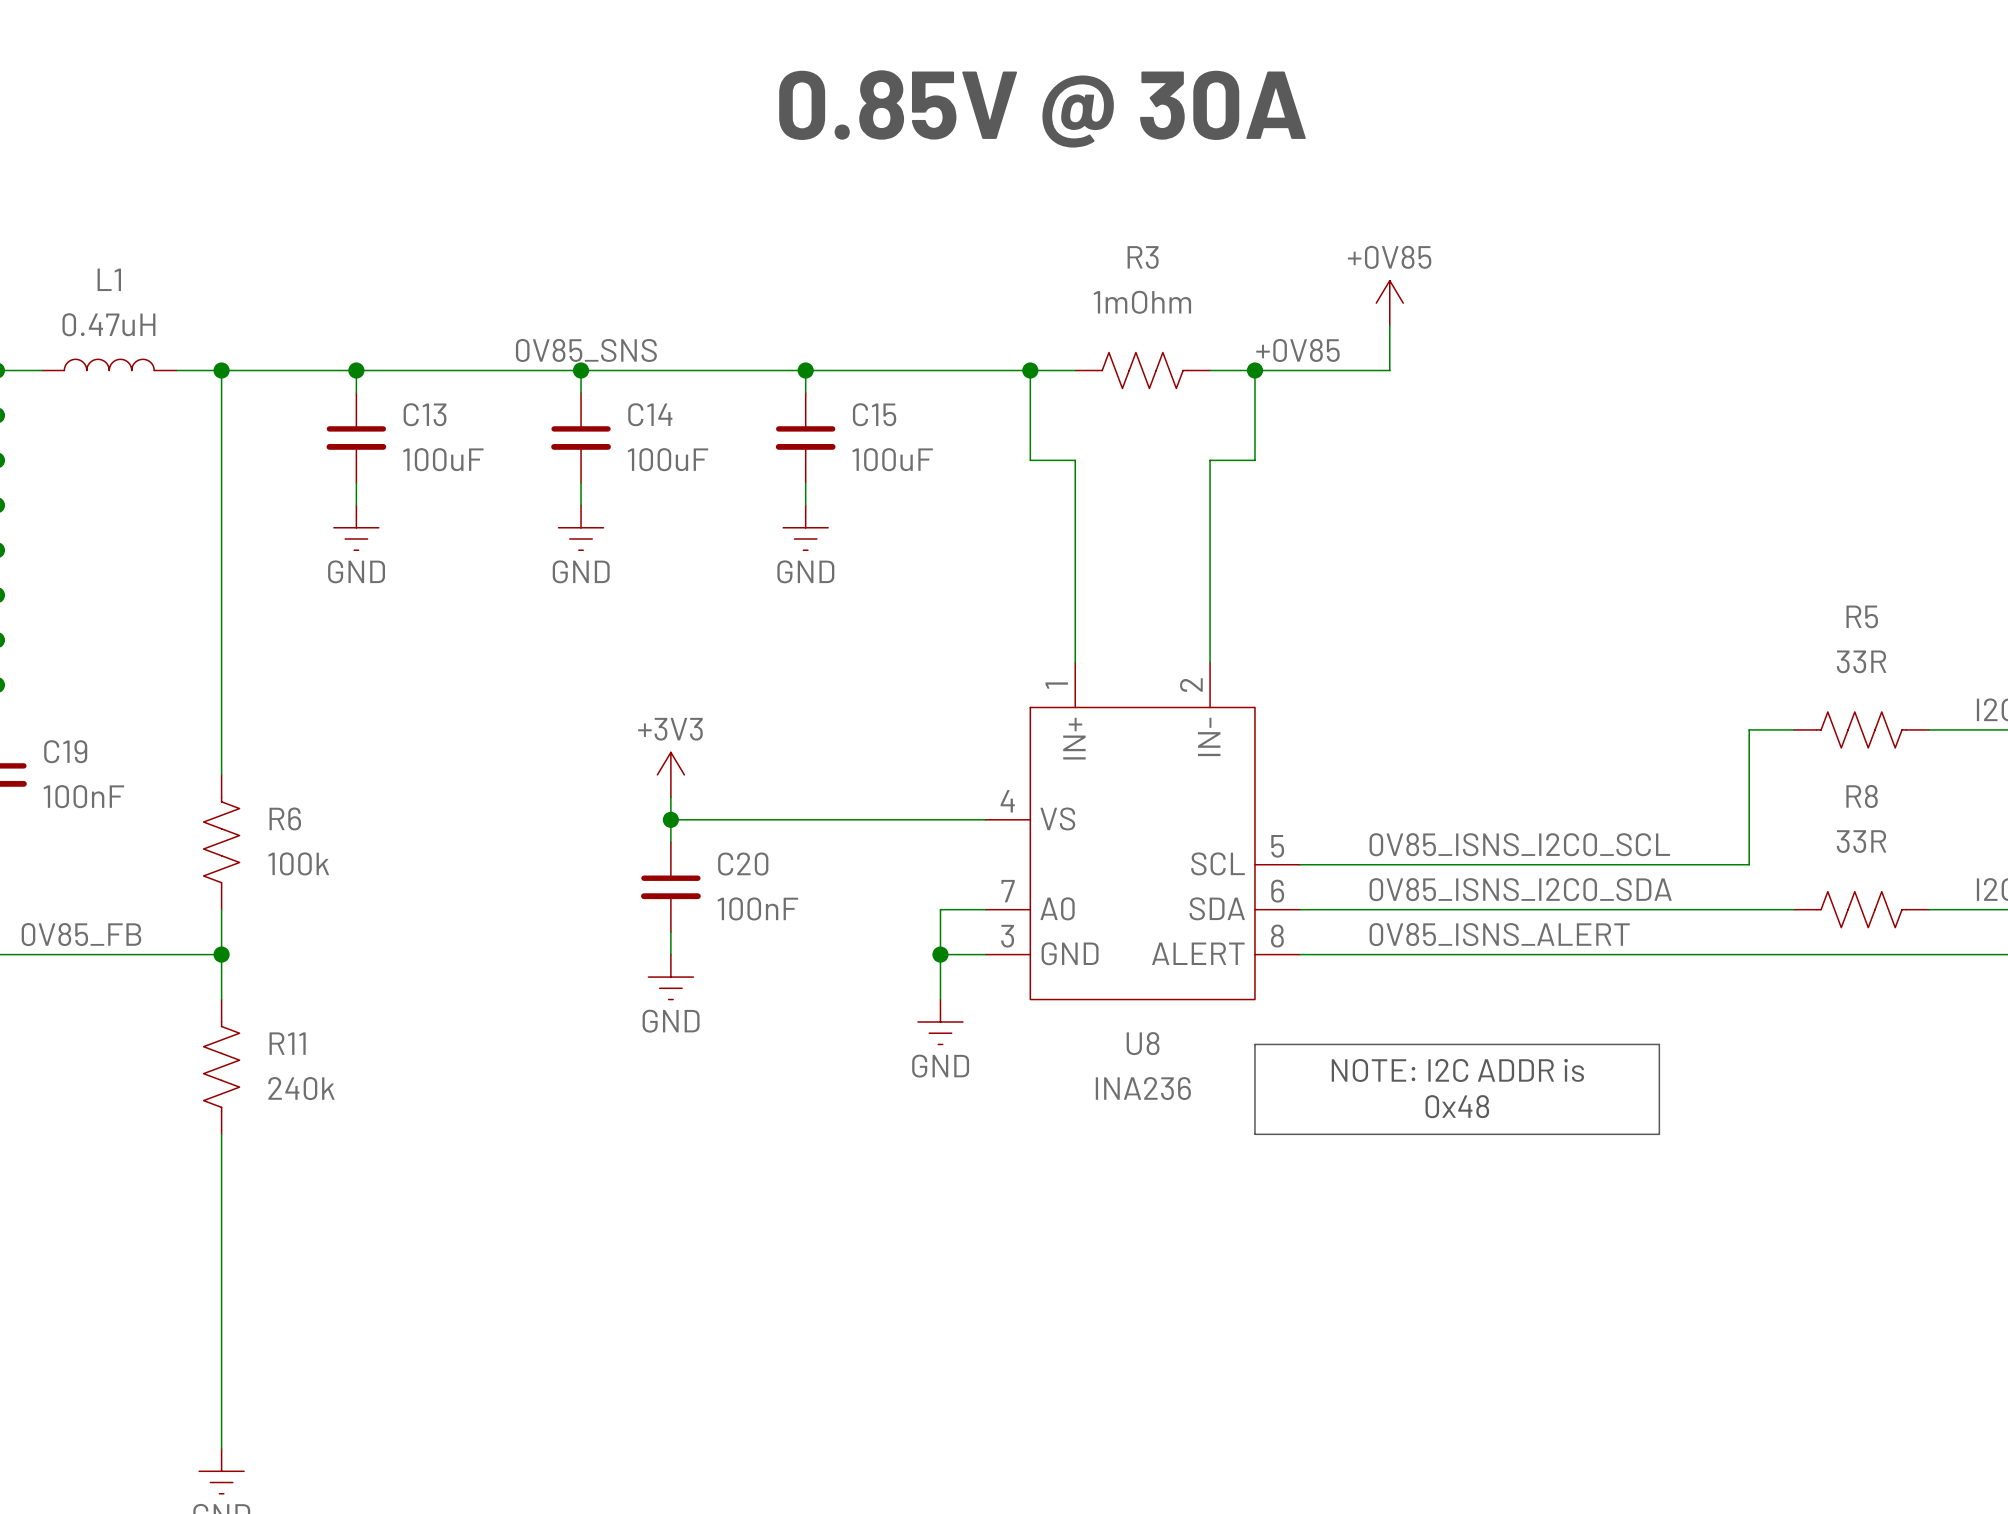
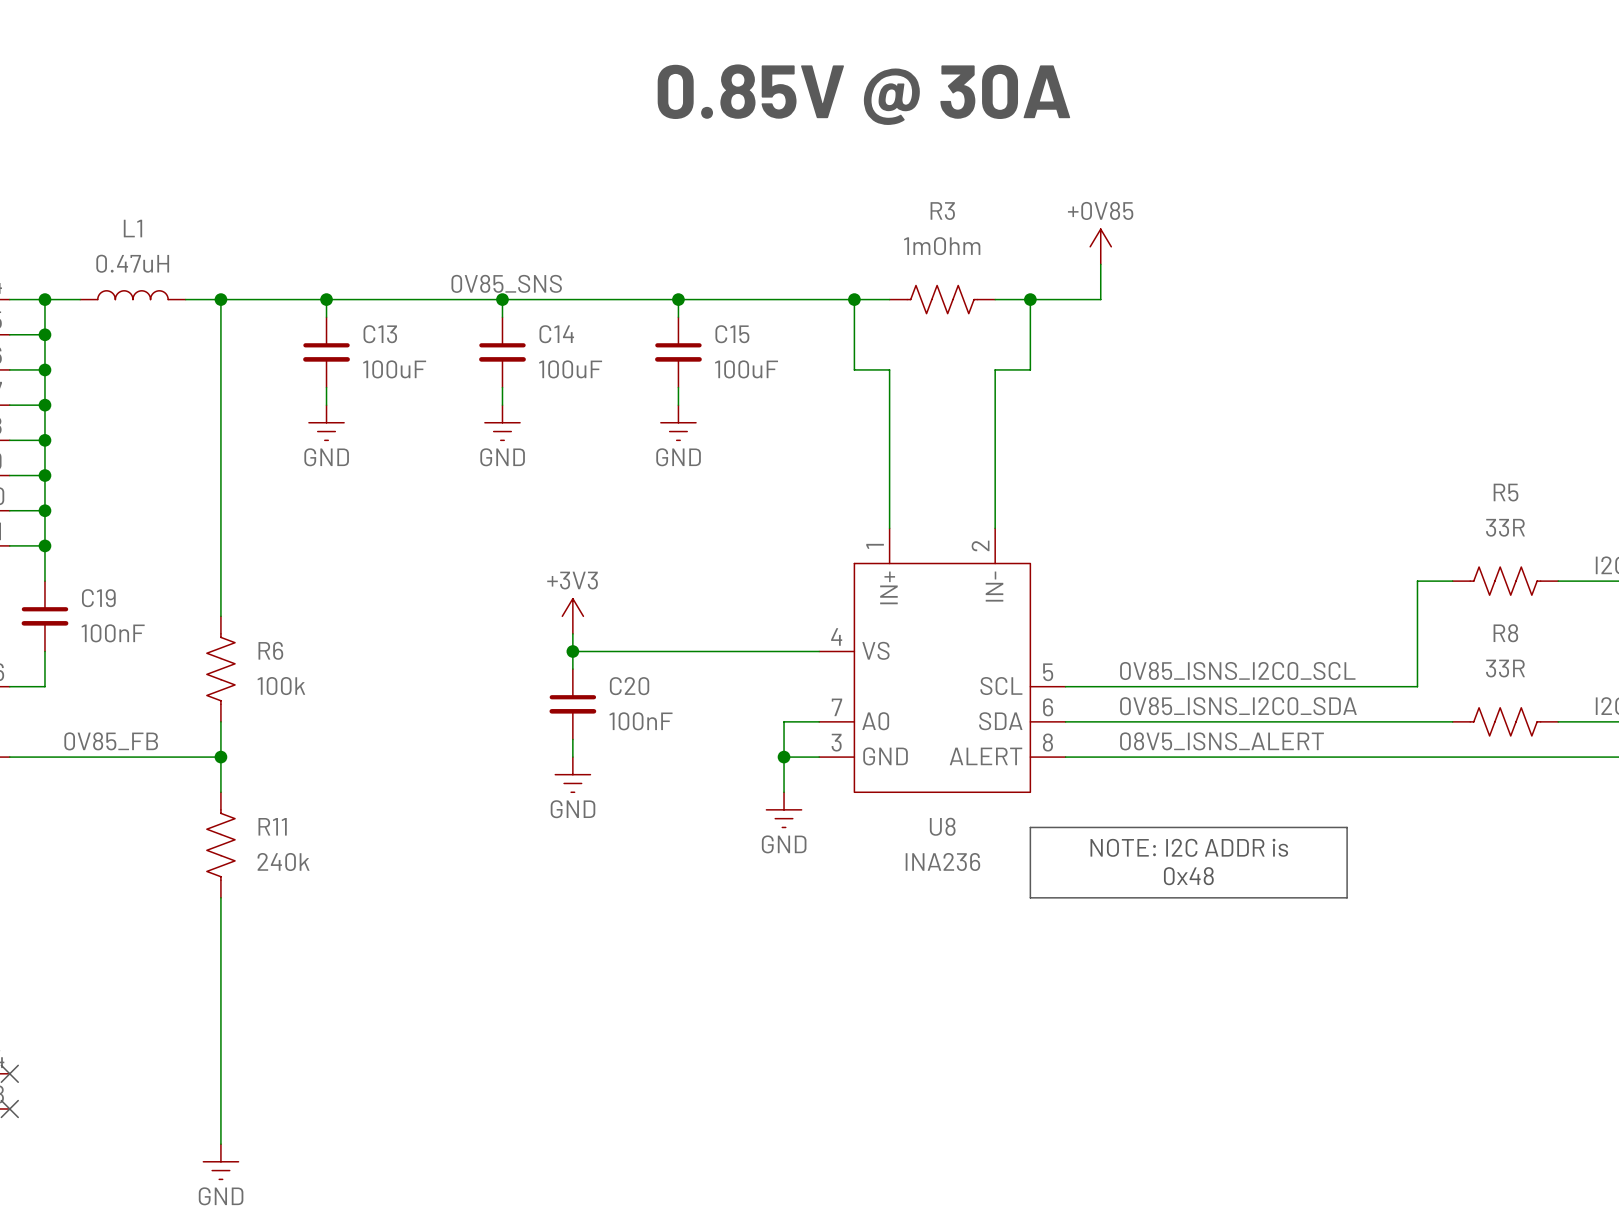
power symbol position: +0V85 (1389, 303) -> +0V85 (1100, 246)
wire: (1389, 325) (1389, 370) (1344, 370) -> (1100, 264) (1100, 299)
label: +0V85 (1297, 350) -> none
label: 0V85_ISNS_ALERT (1499, 934) -> 08V5_ISNS_ALERT (1222, 741)

